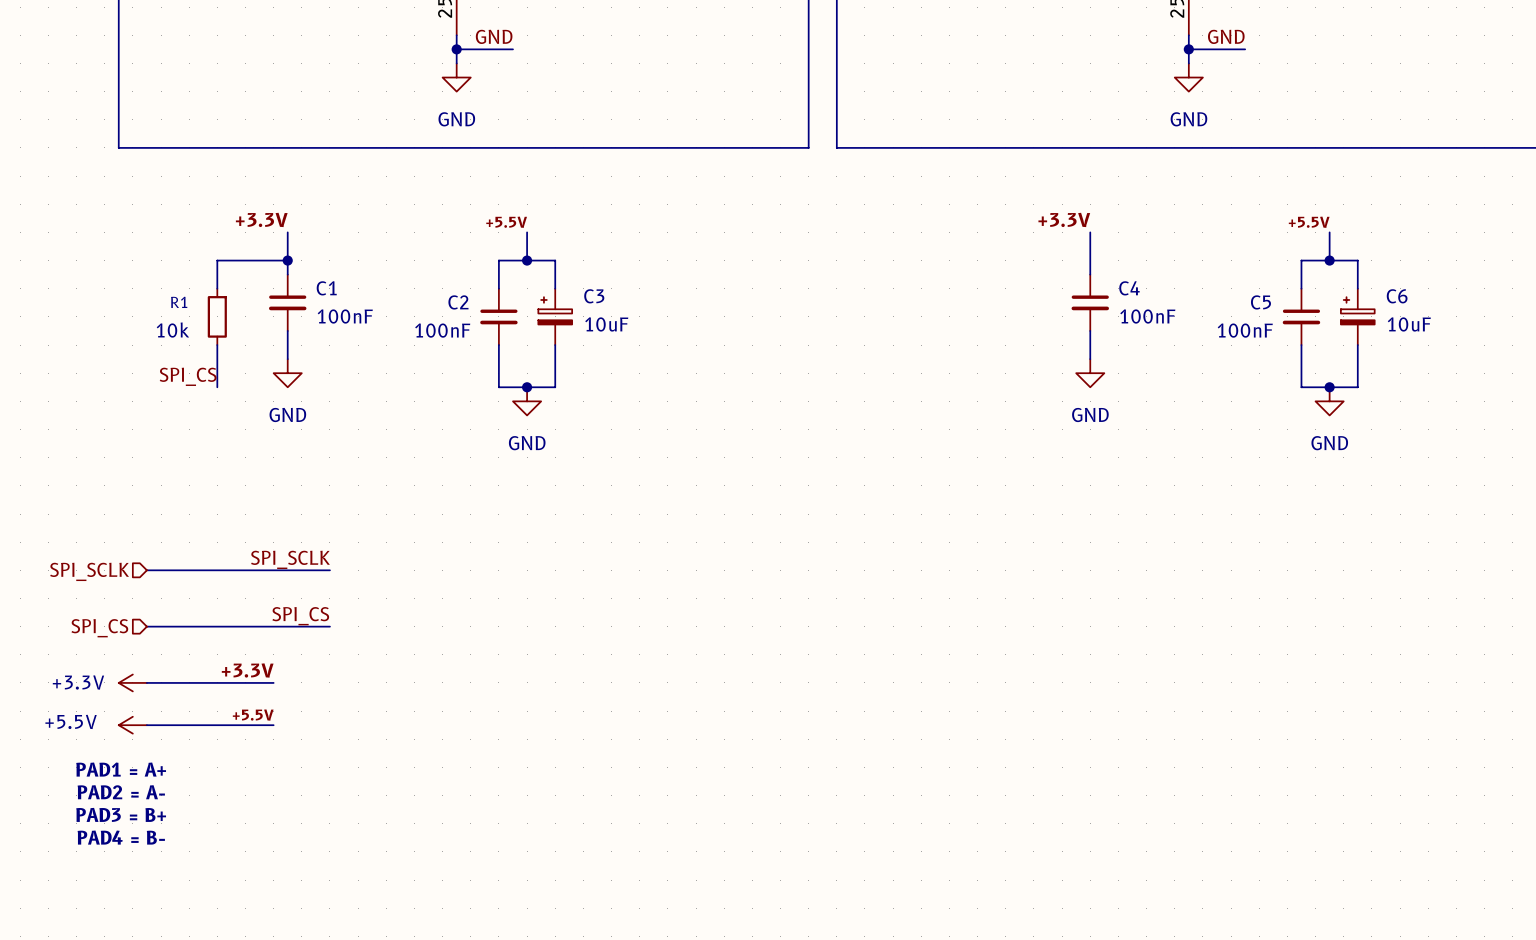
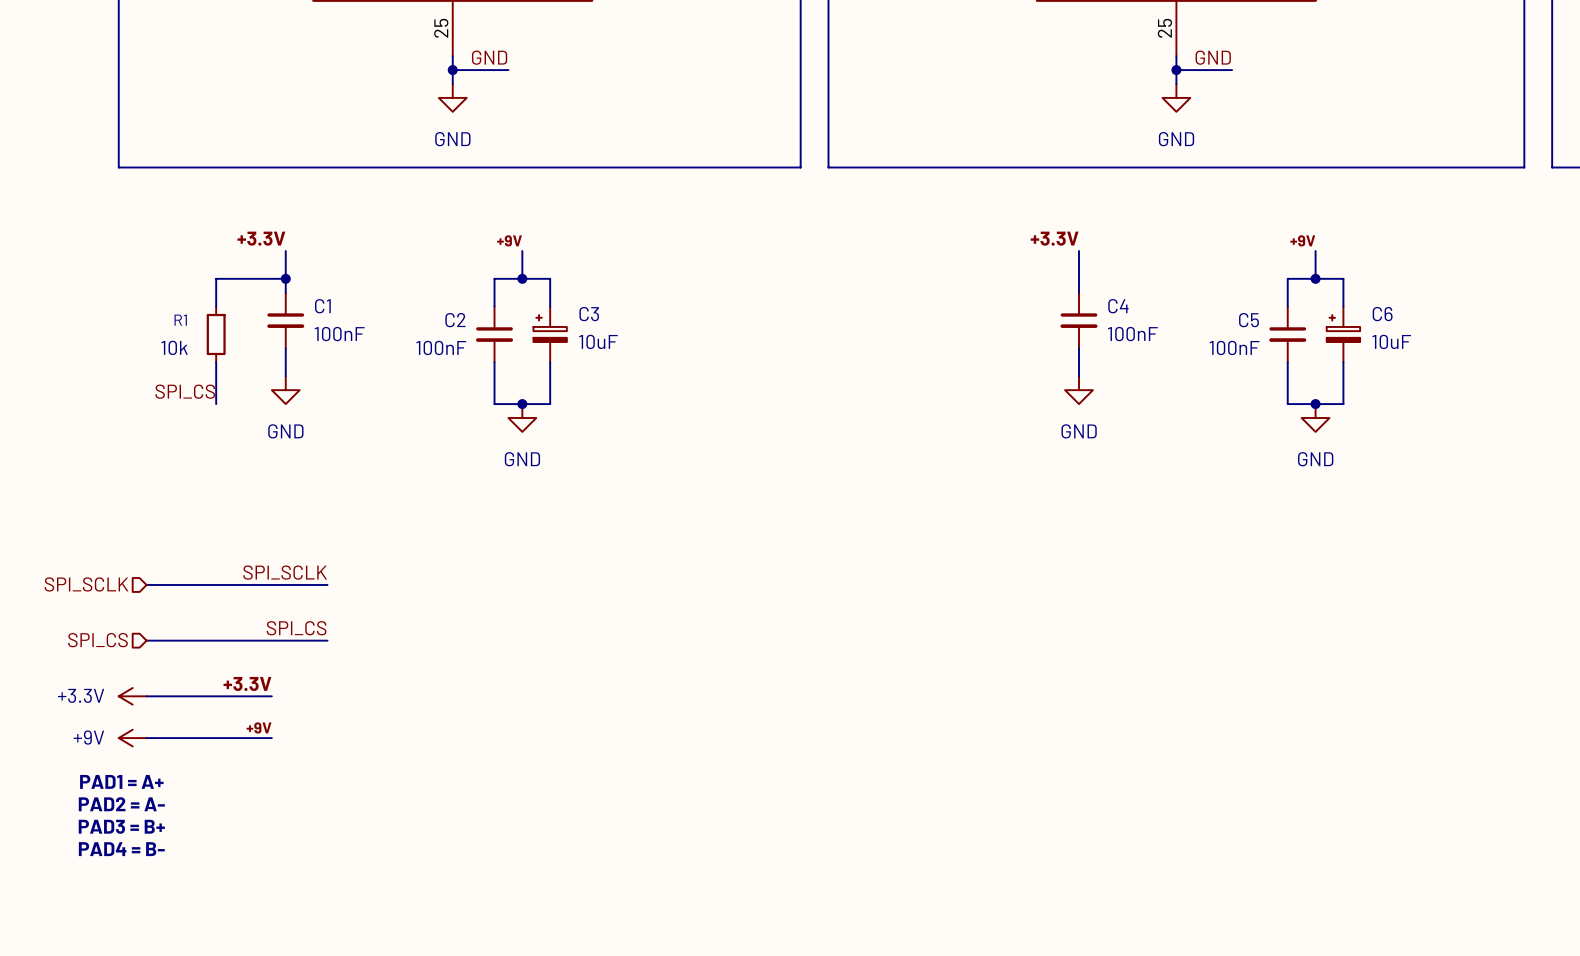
label: +5.5V (506, 222) -> +9V (509, 240)
label: +5.5V (1309, 222) -> +9V (1302, 240)
label: +5.5V (253, 715) -> +9V (259, 727)
power symbol: +5.5V (132, 725) -> +9V (132, 738)

